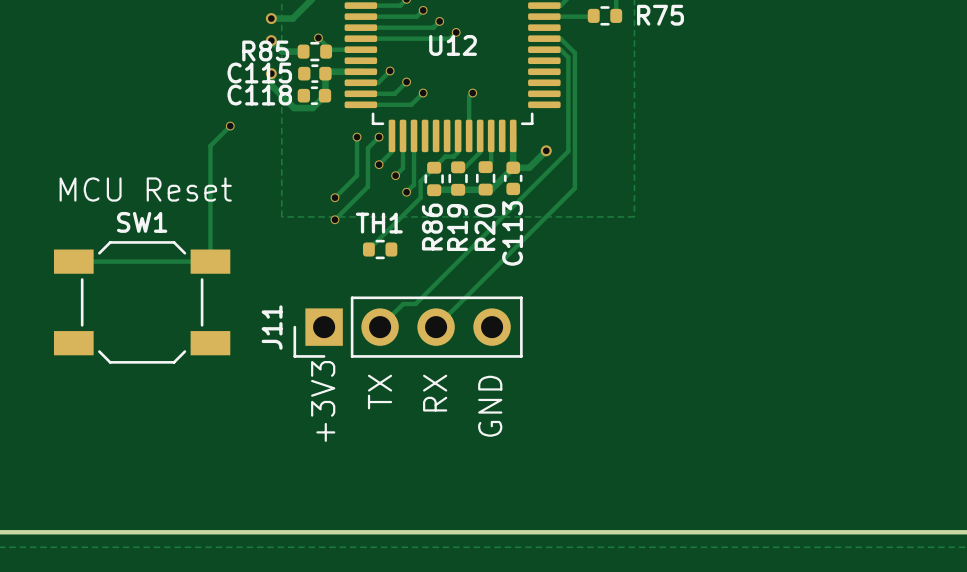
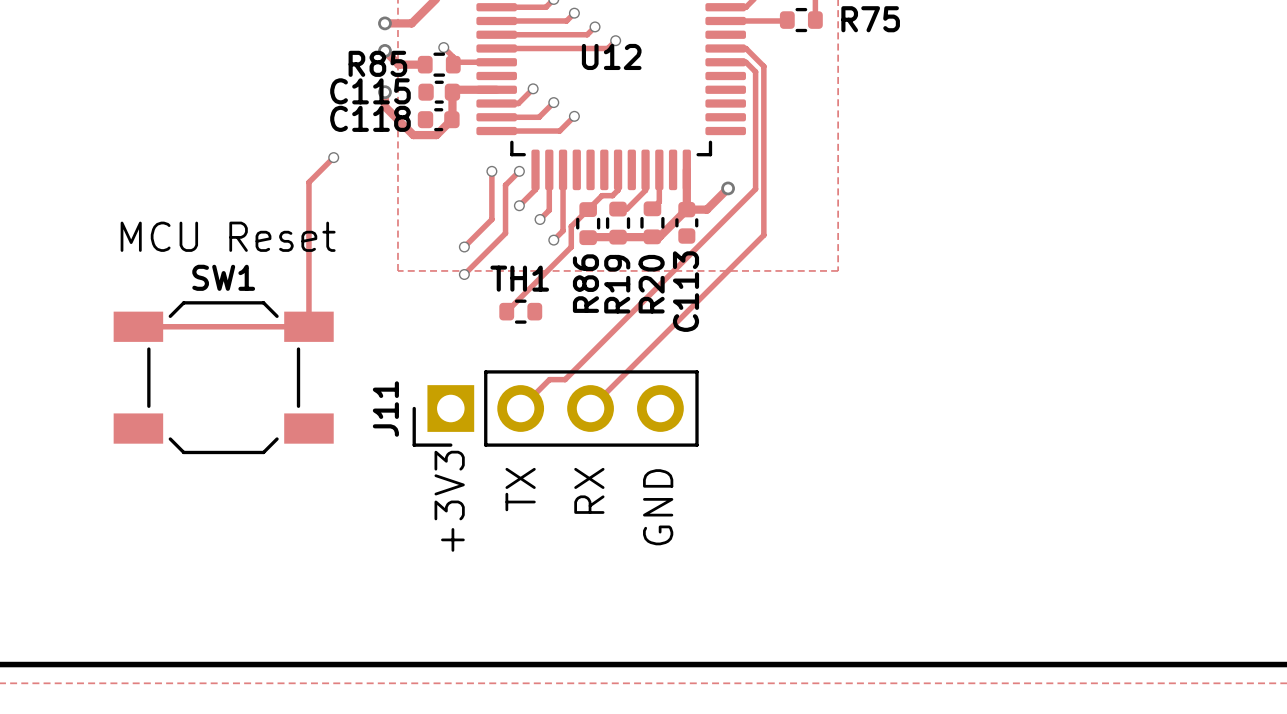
track: (472, 93) (469, 96) (469, 135) -> none
via: (472, 93) -> none

